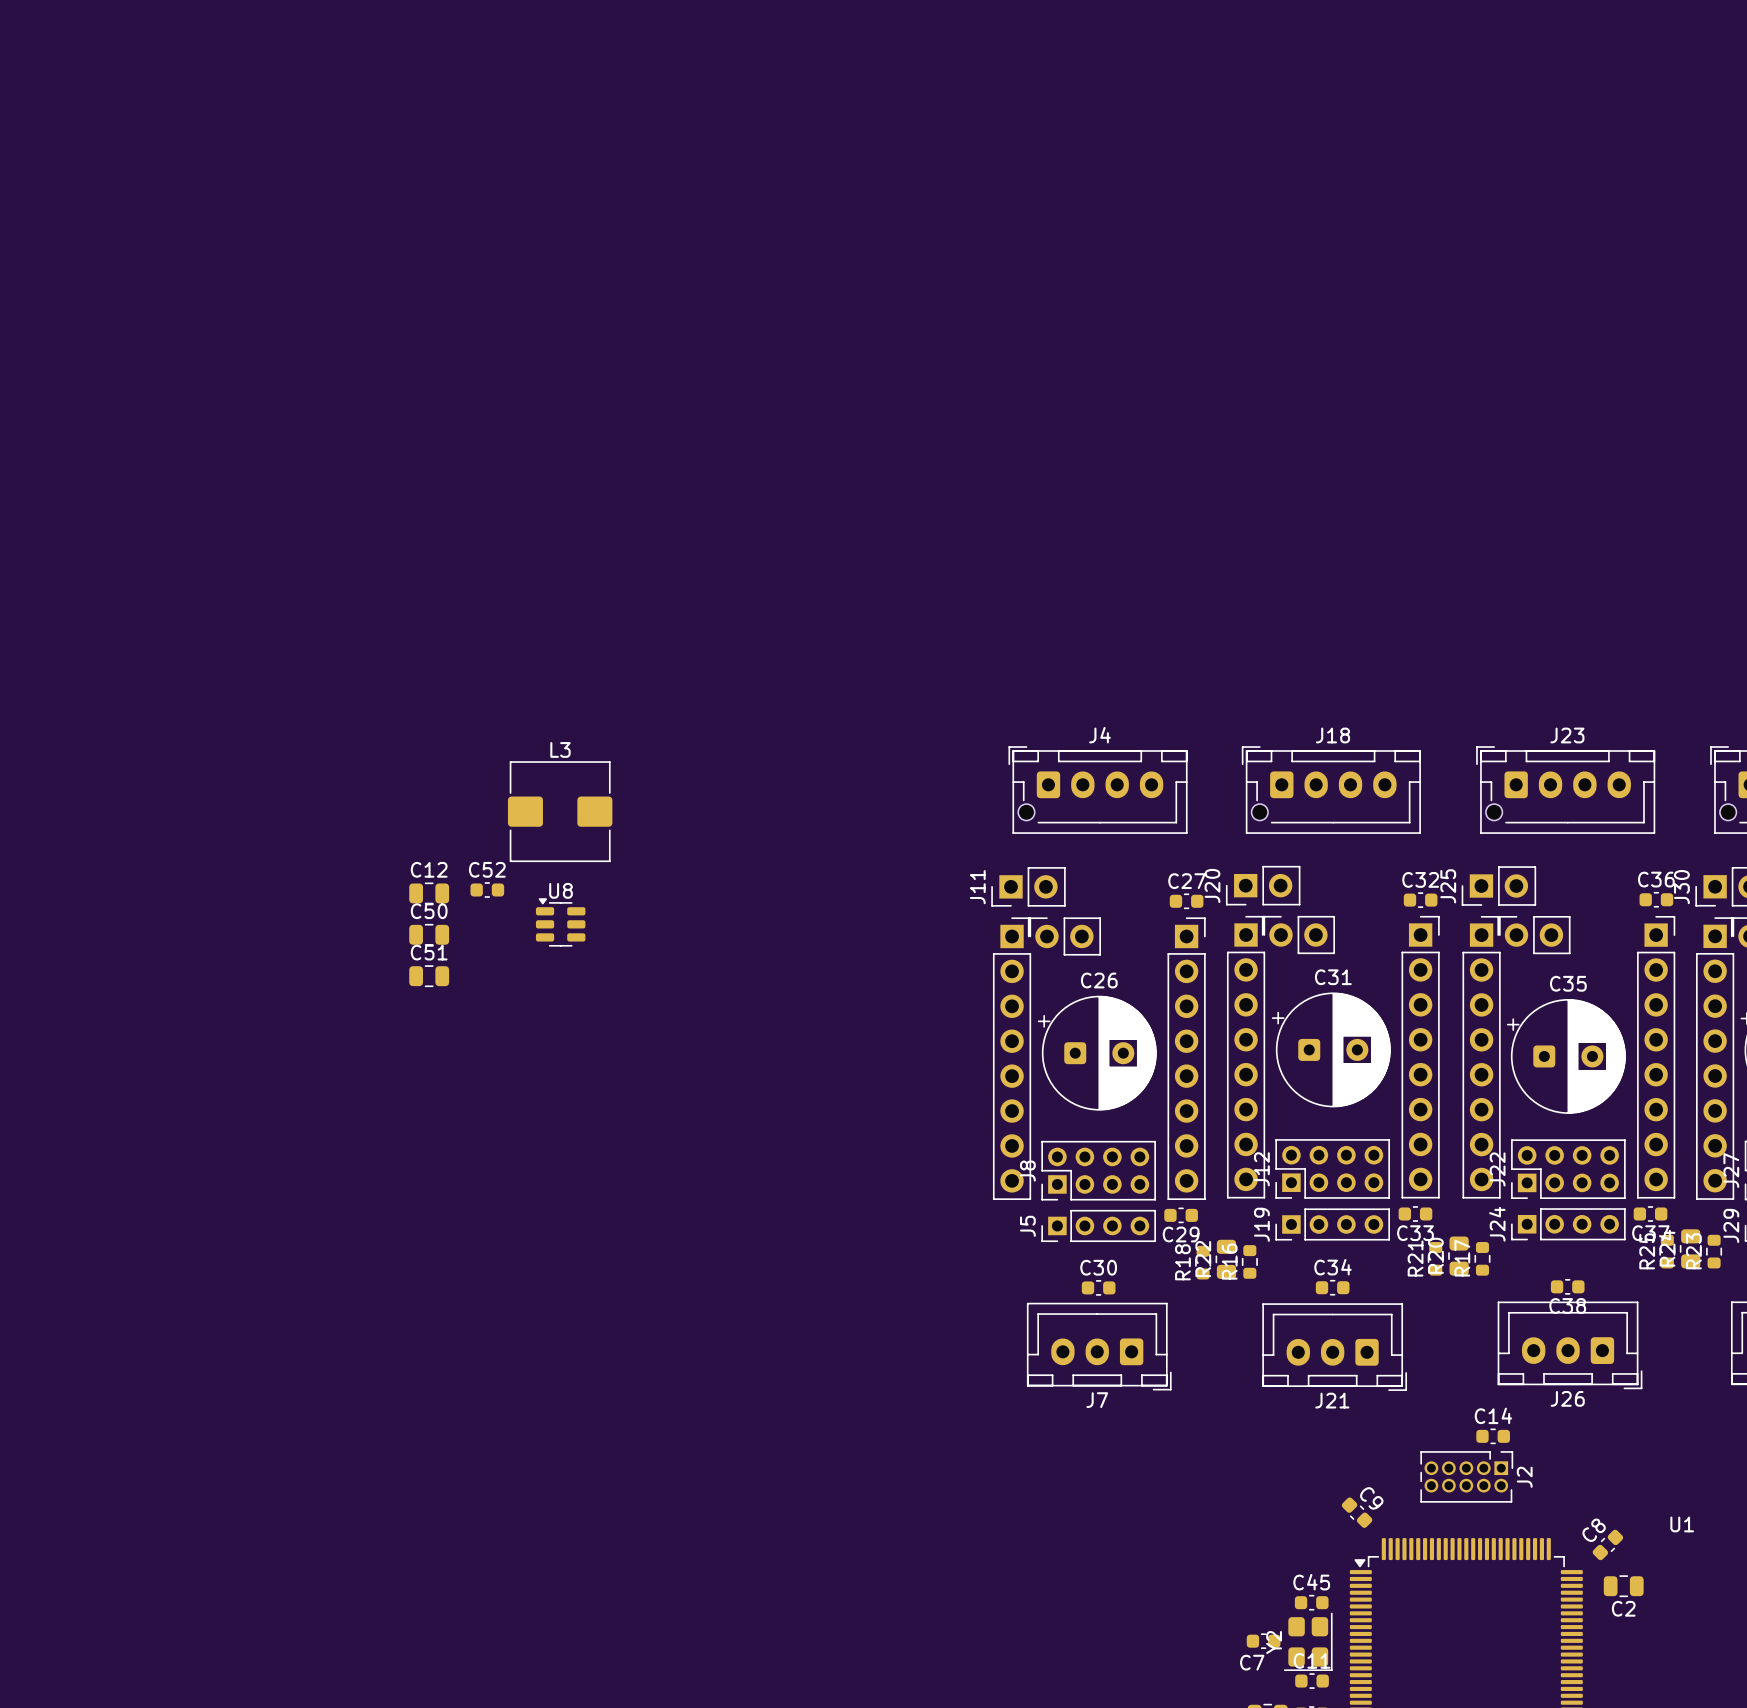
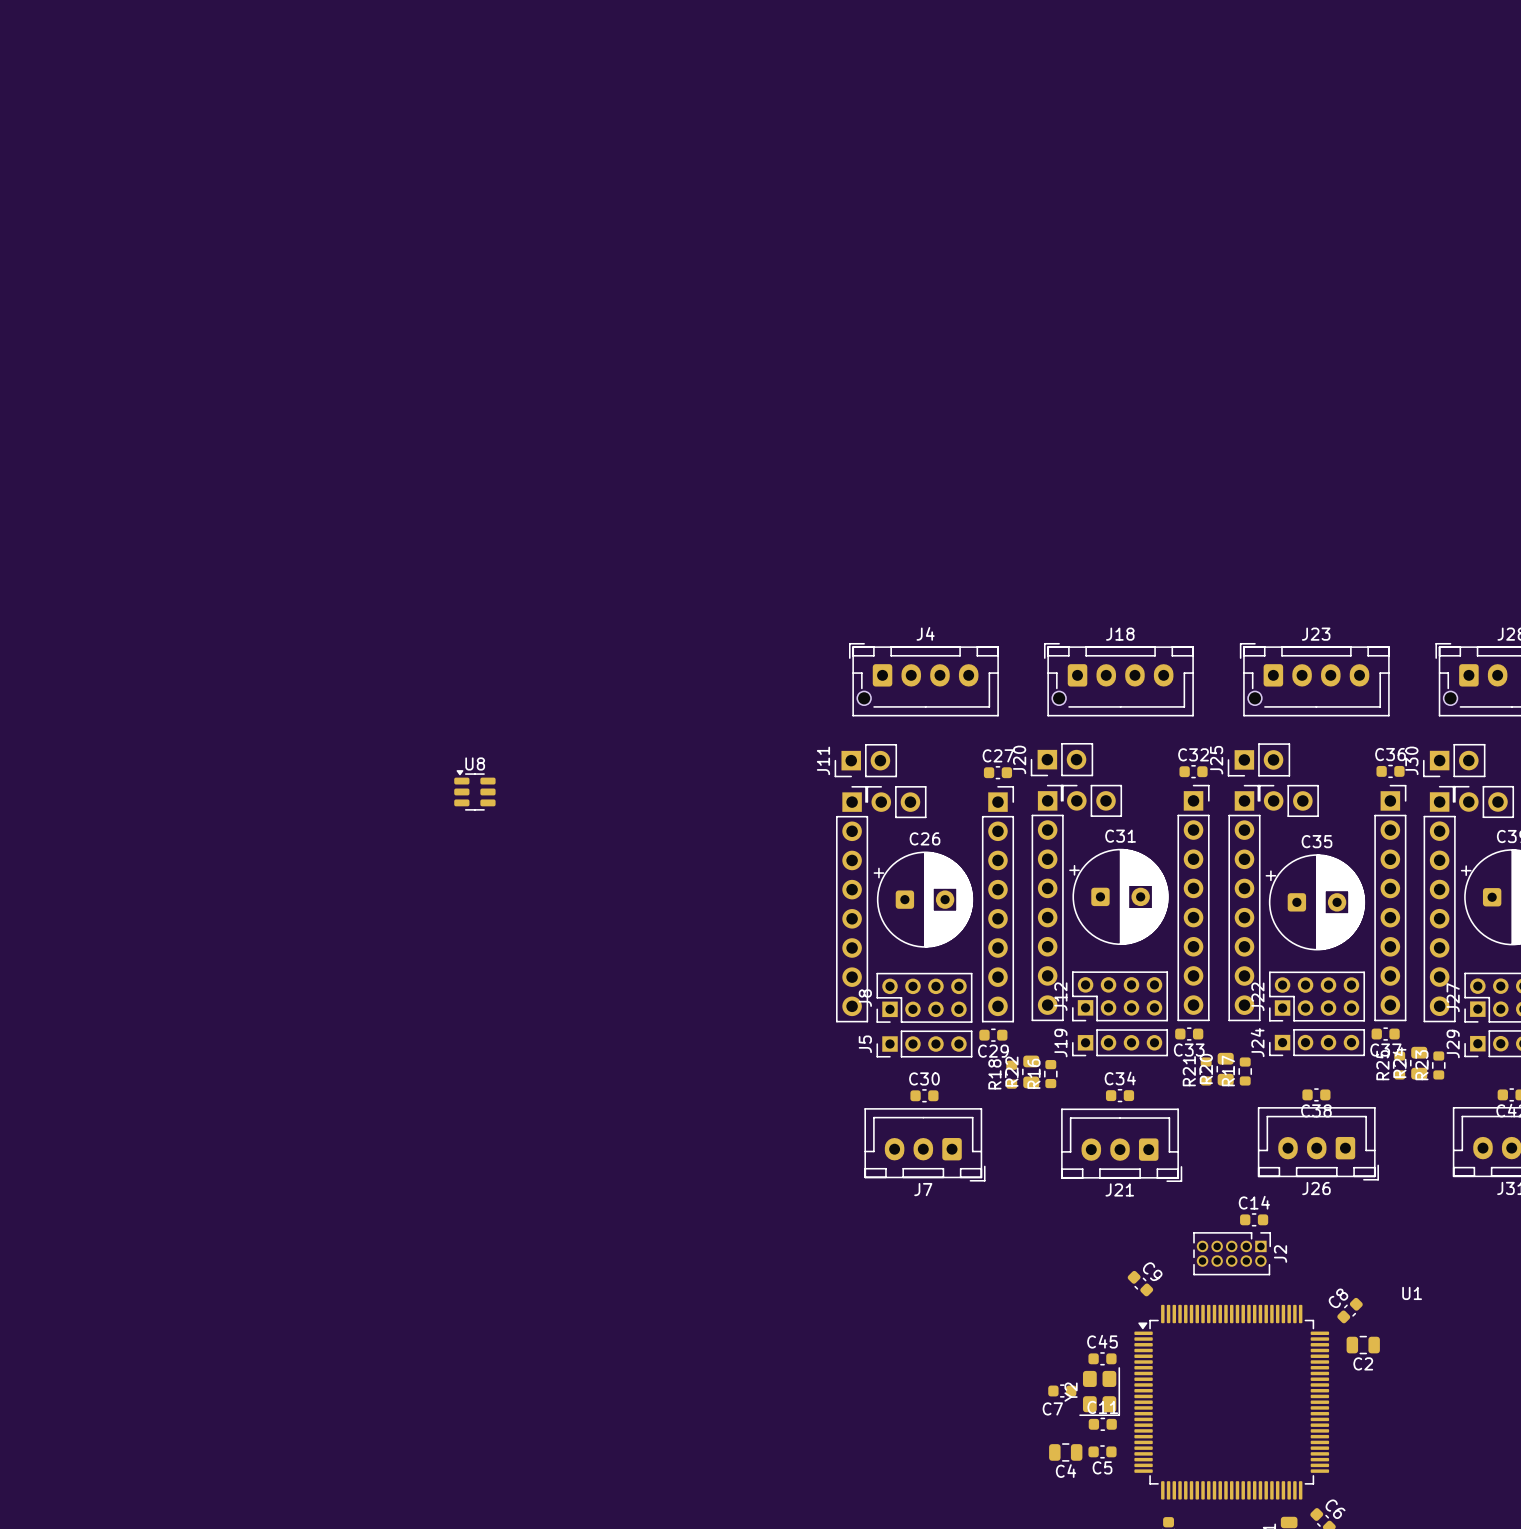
L3: (560, 811) -> none
C52: (487, 889) -> none
C12: (429, 893) -> none
C50: (429, 934) -> none
C51: (429, 976) -> none

